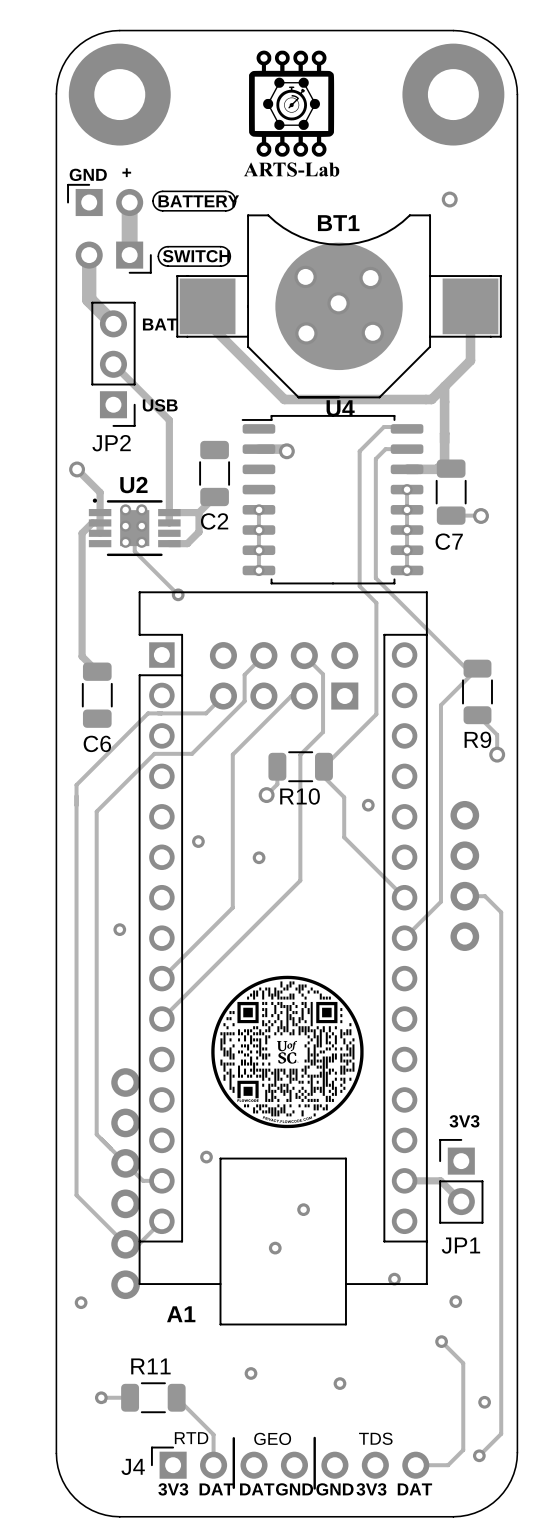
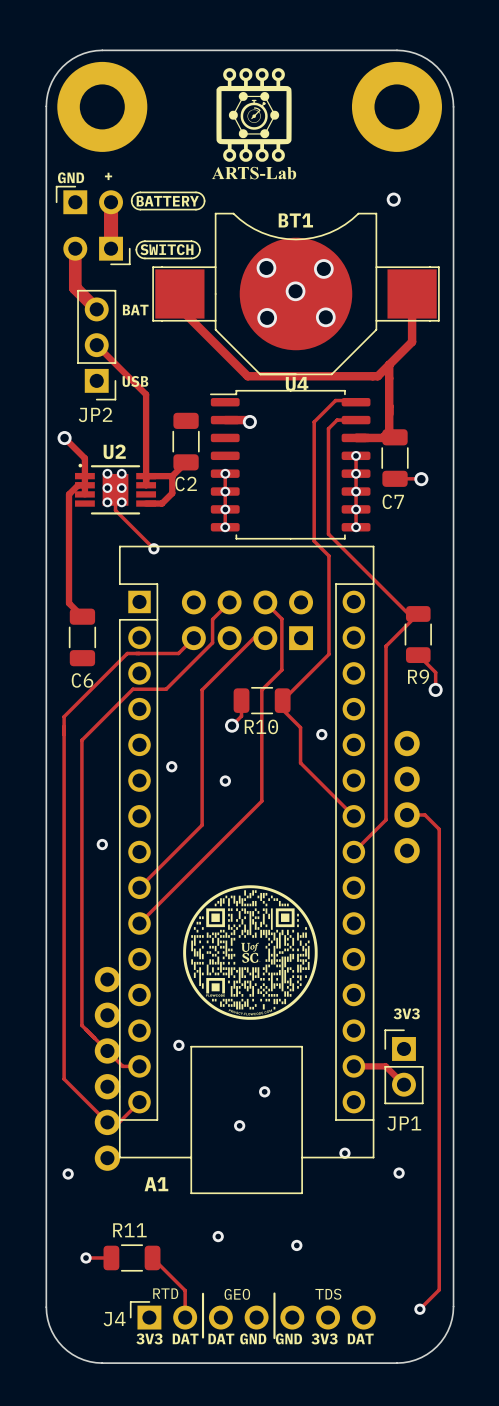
track: (441, 1341) (463, 1363) (463, 1450) (448, 1465) (415, 1465) -> none
via: (441, 1341) -> none
via: (484, 1402) -> none

